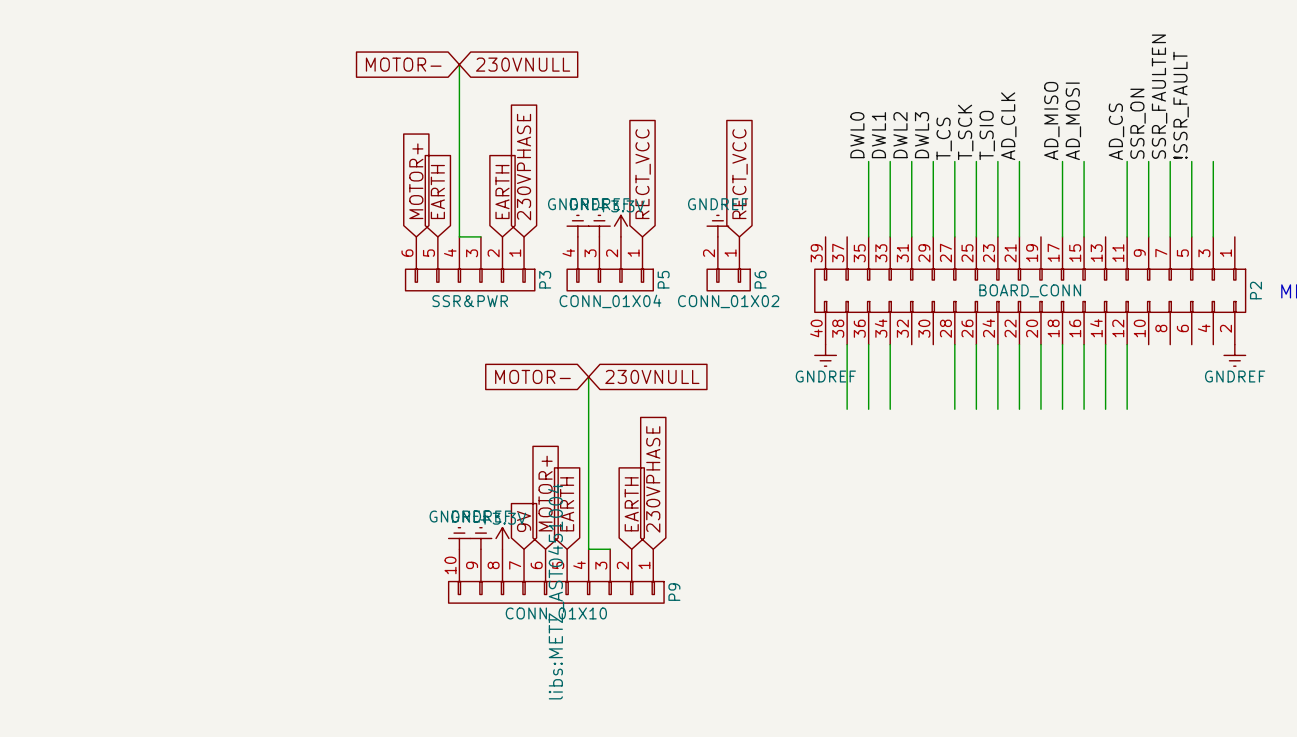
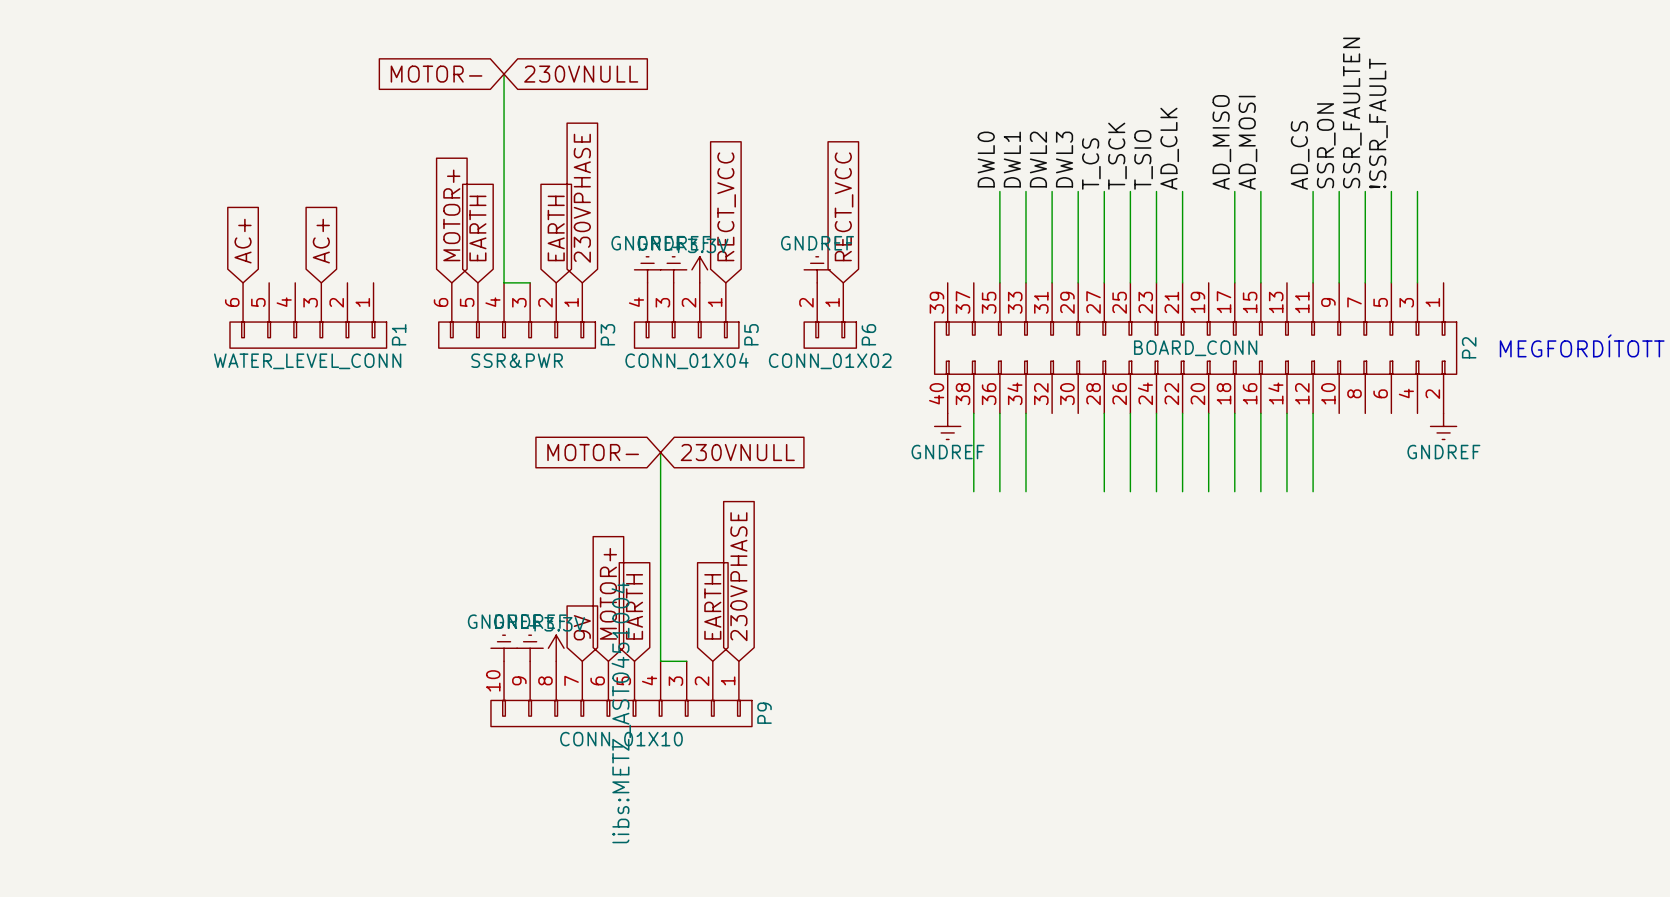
global label: none -> AC+ (243, 241)
global label: none -> AC+ (321, 241)
P1: none -> WATER_LEVEL_CONN (308, 315)

